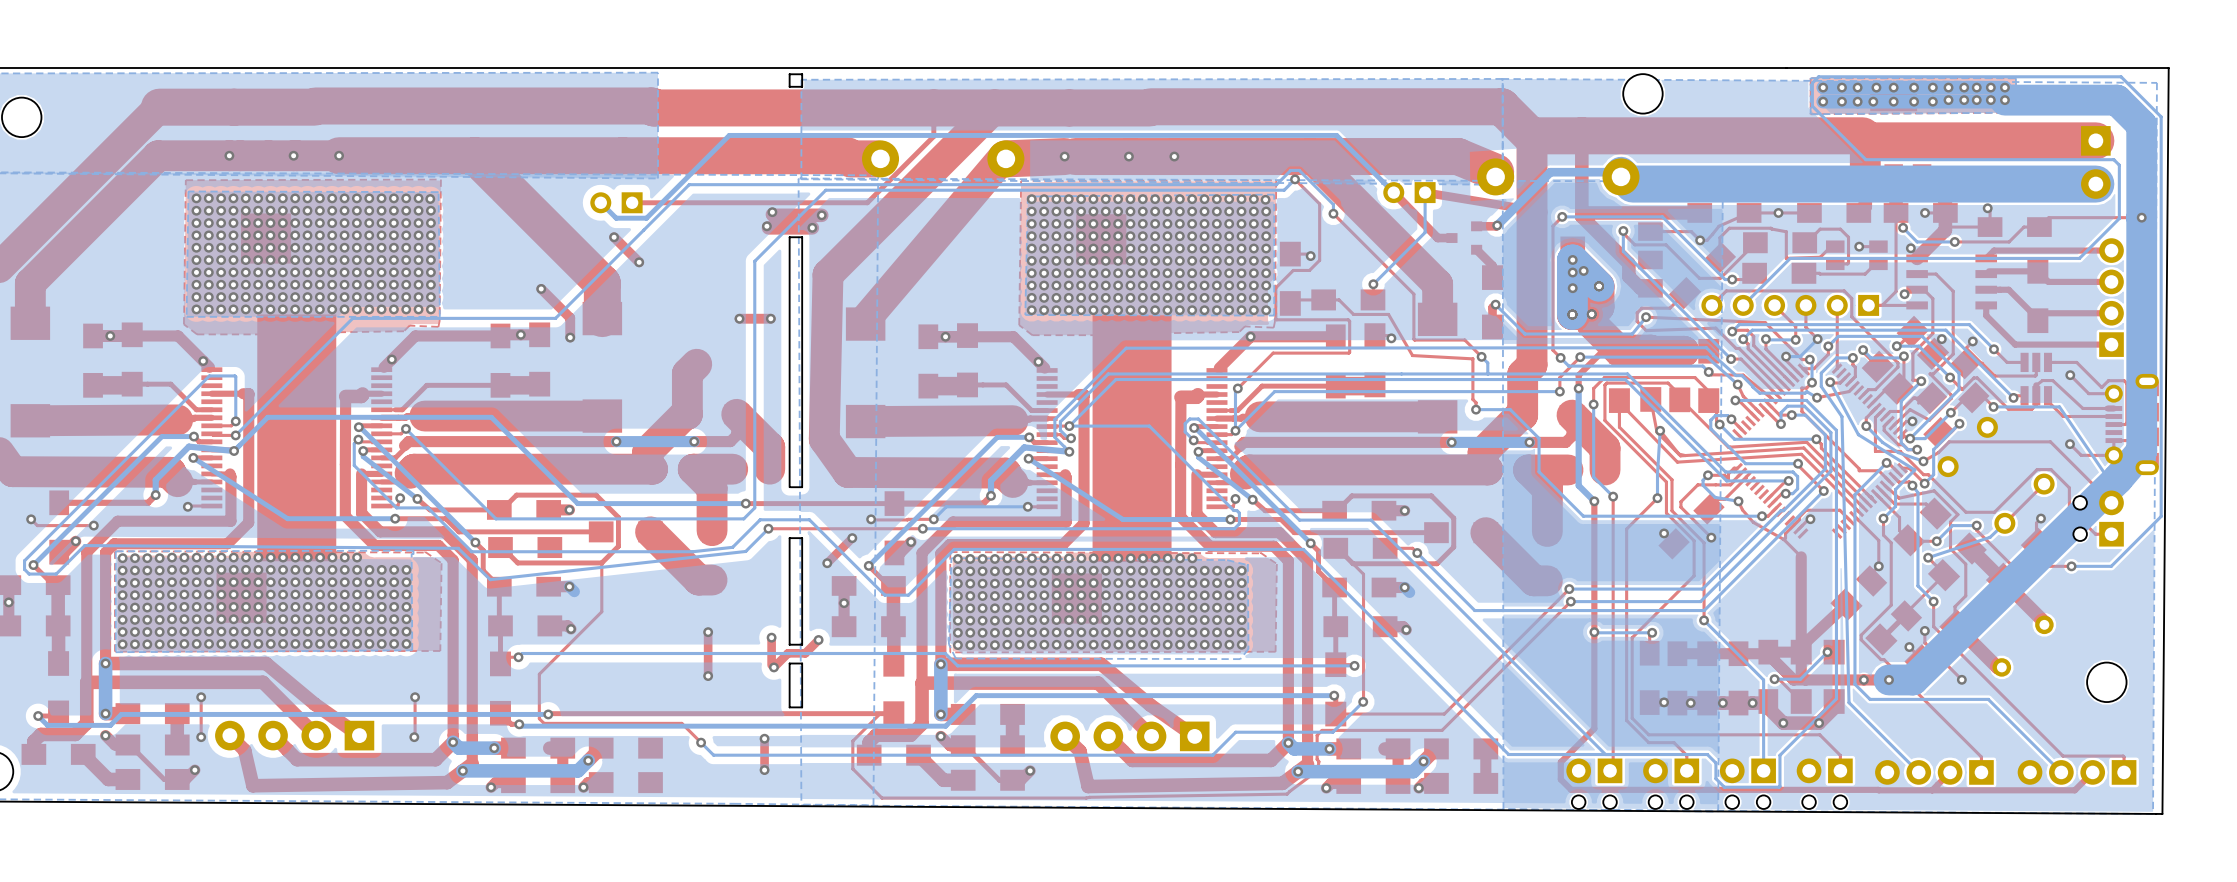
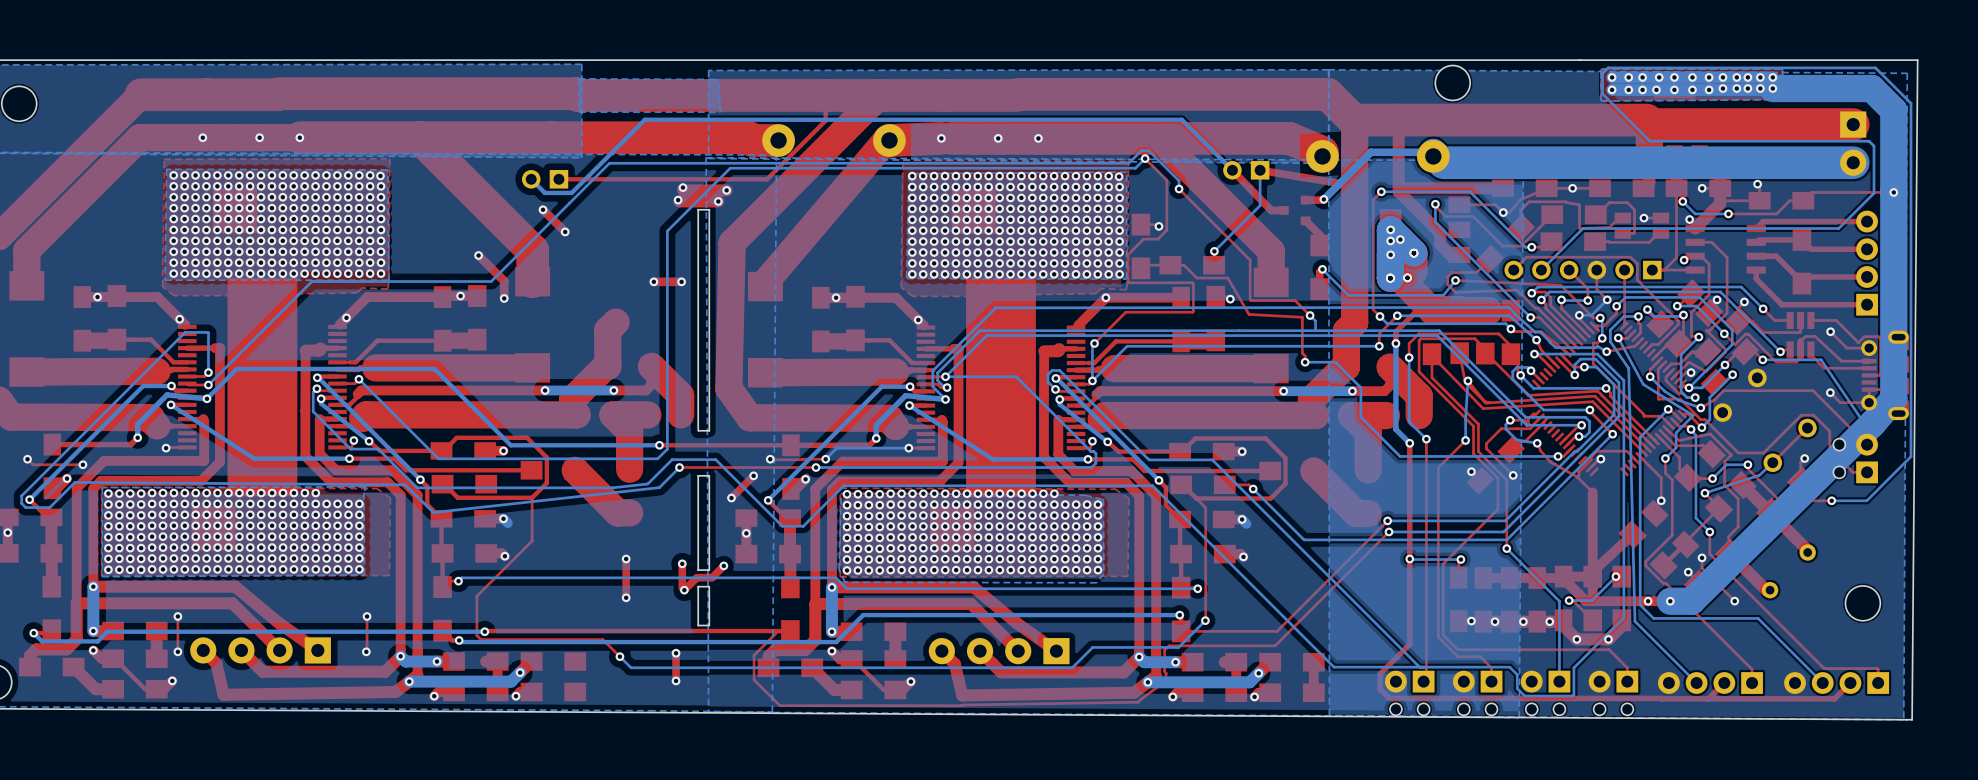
board edge: (802, 74) (789, 74) (789, 86) (802, 86) (802, 74) -> none
bottom zone outline: none -> (579, 78) (719, 80) (720, 112) (579, 112) (579, 78)

